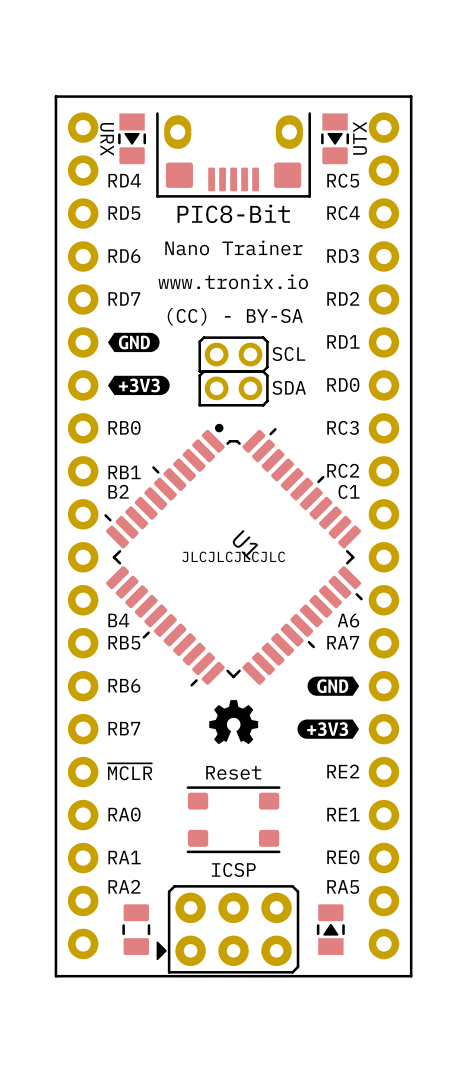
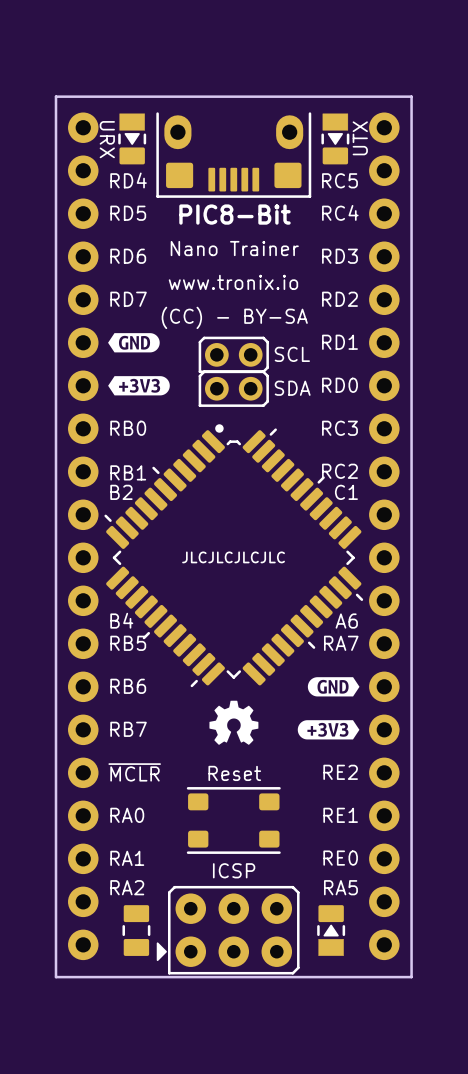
U1 name: U1 (245, 545) -> none

